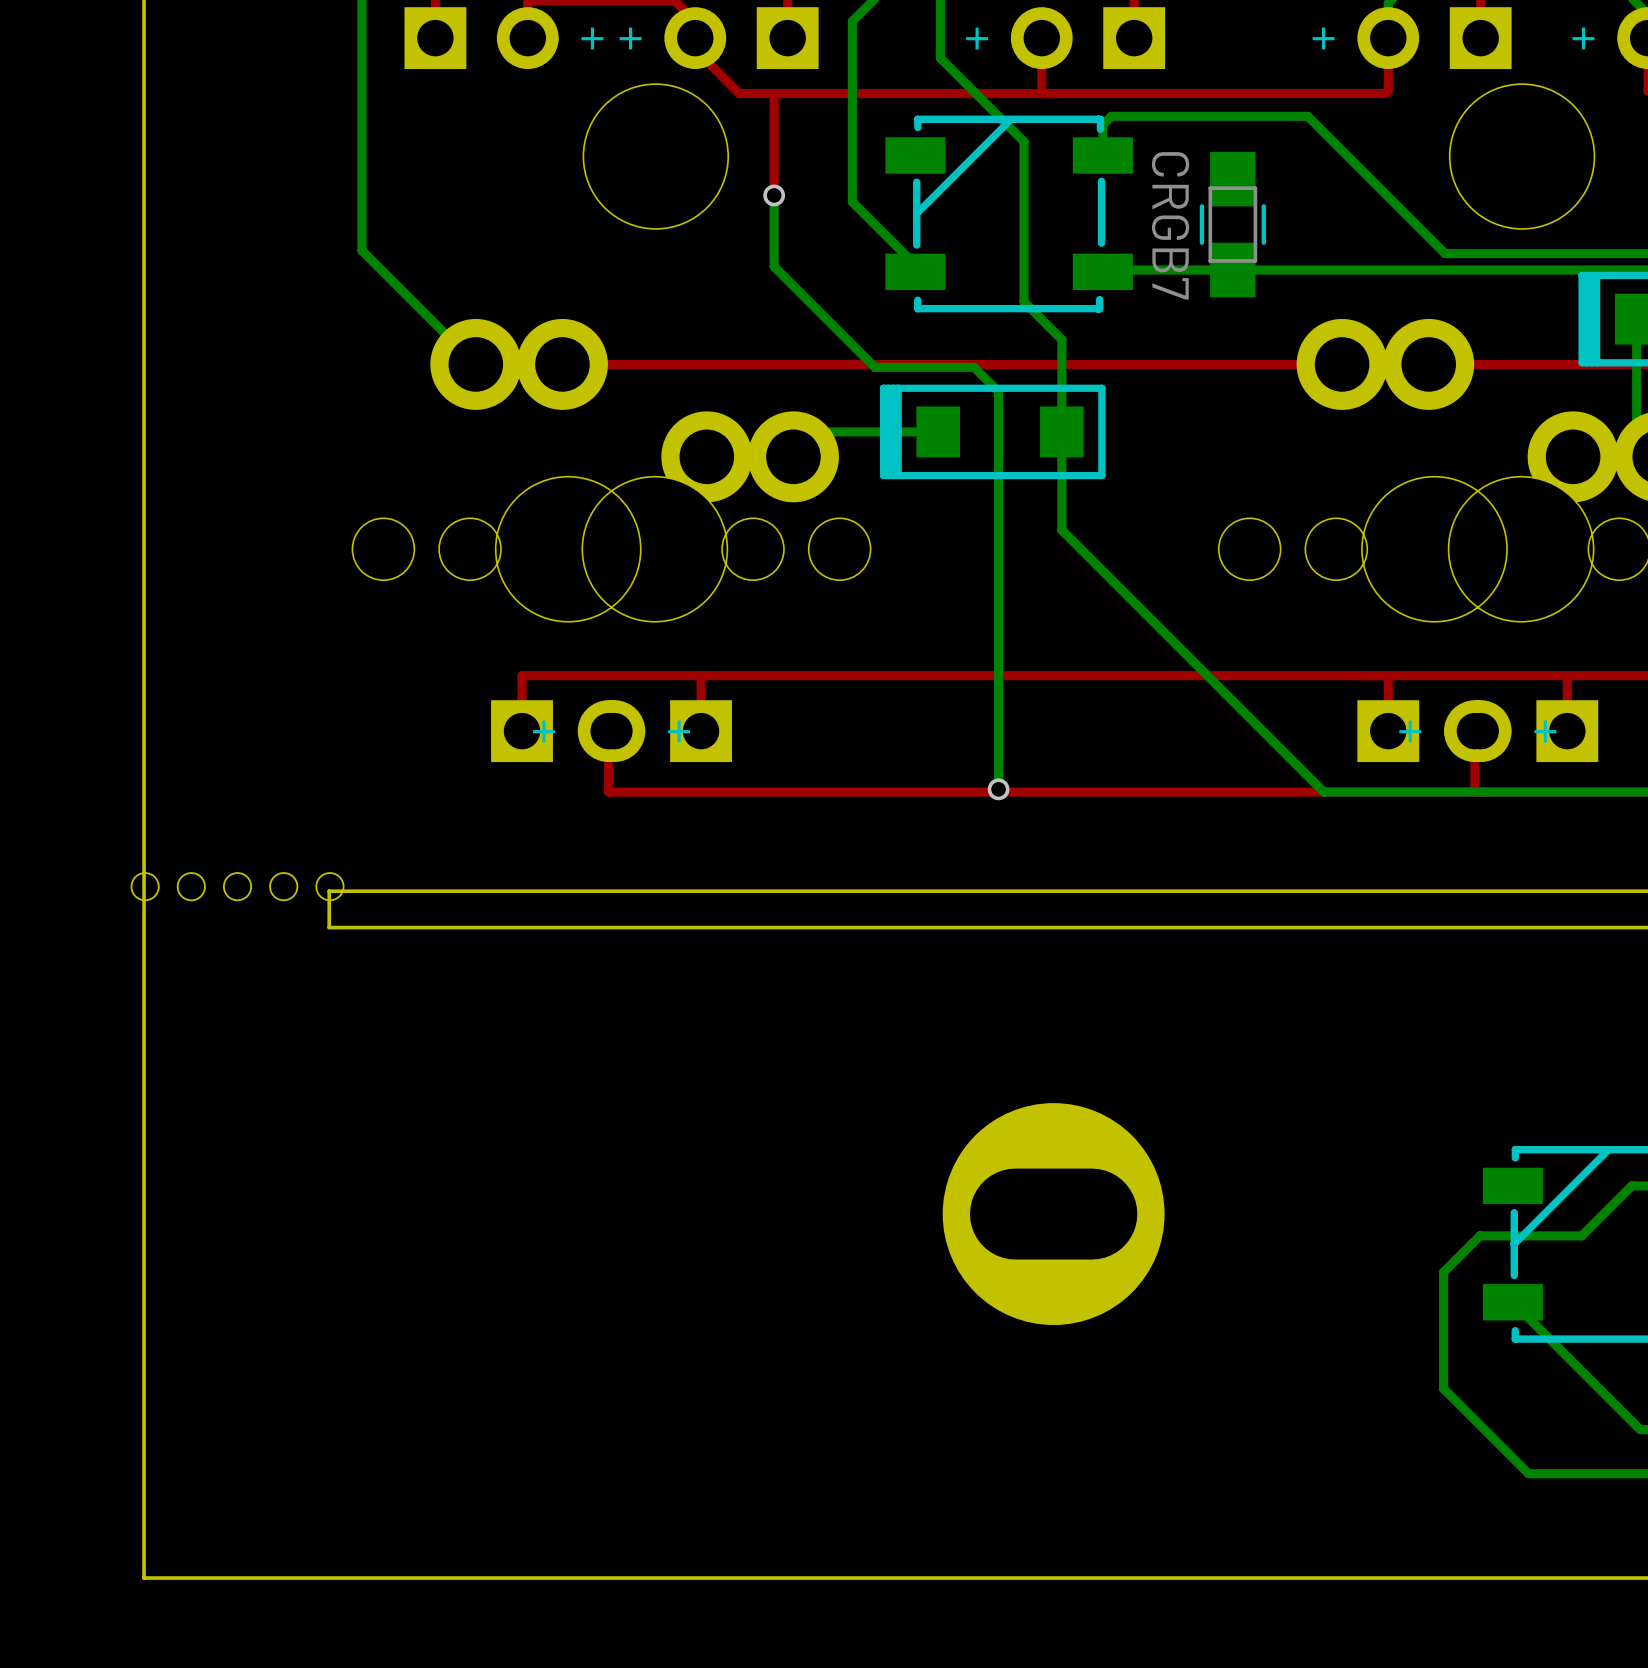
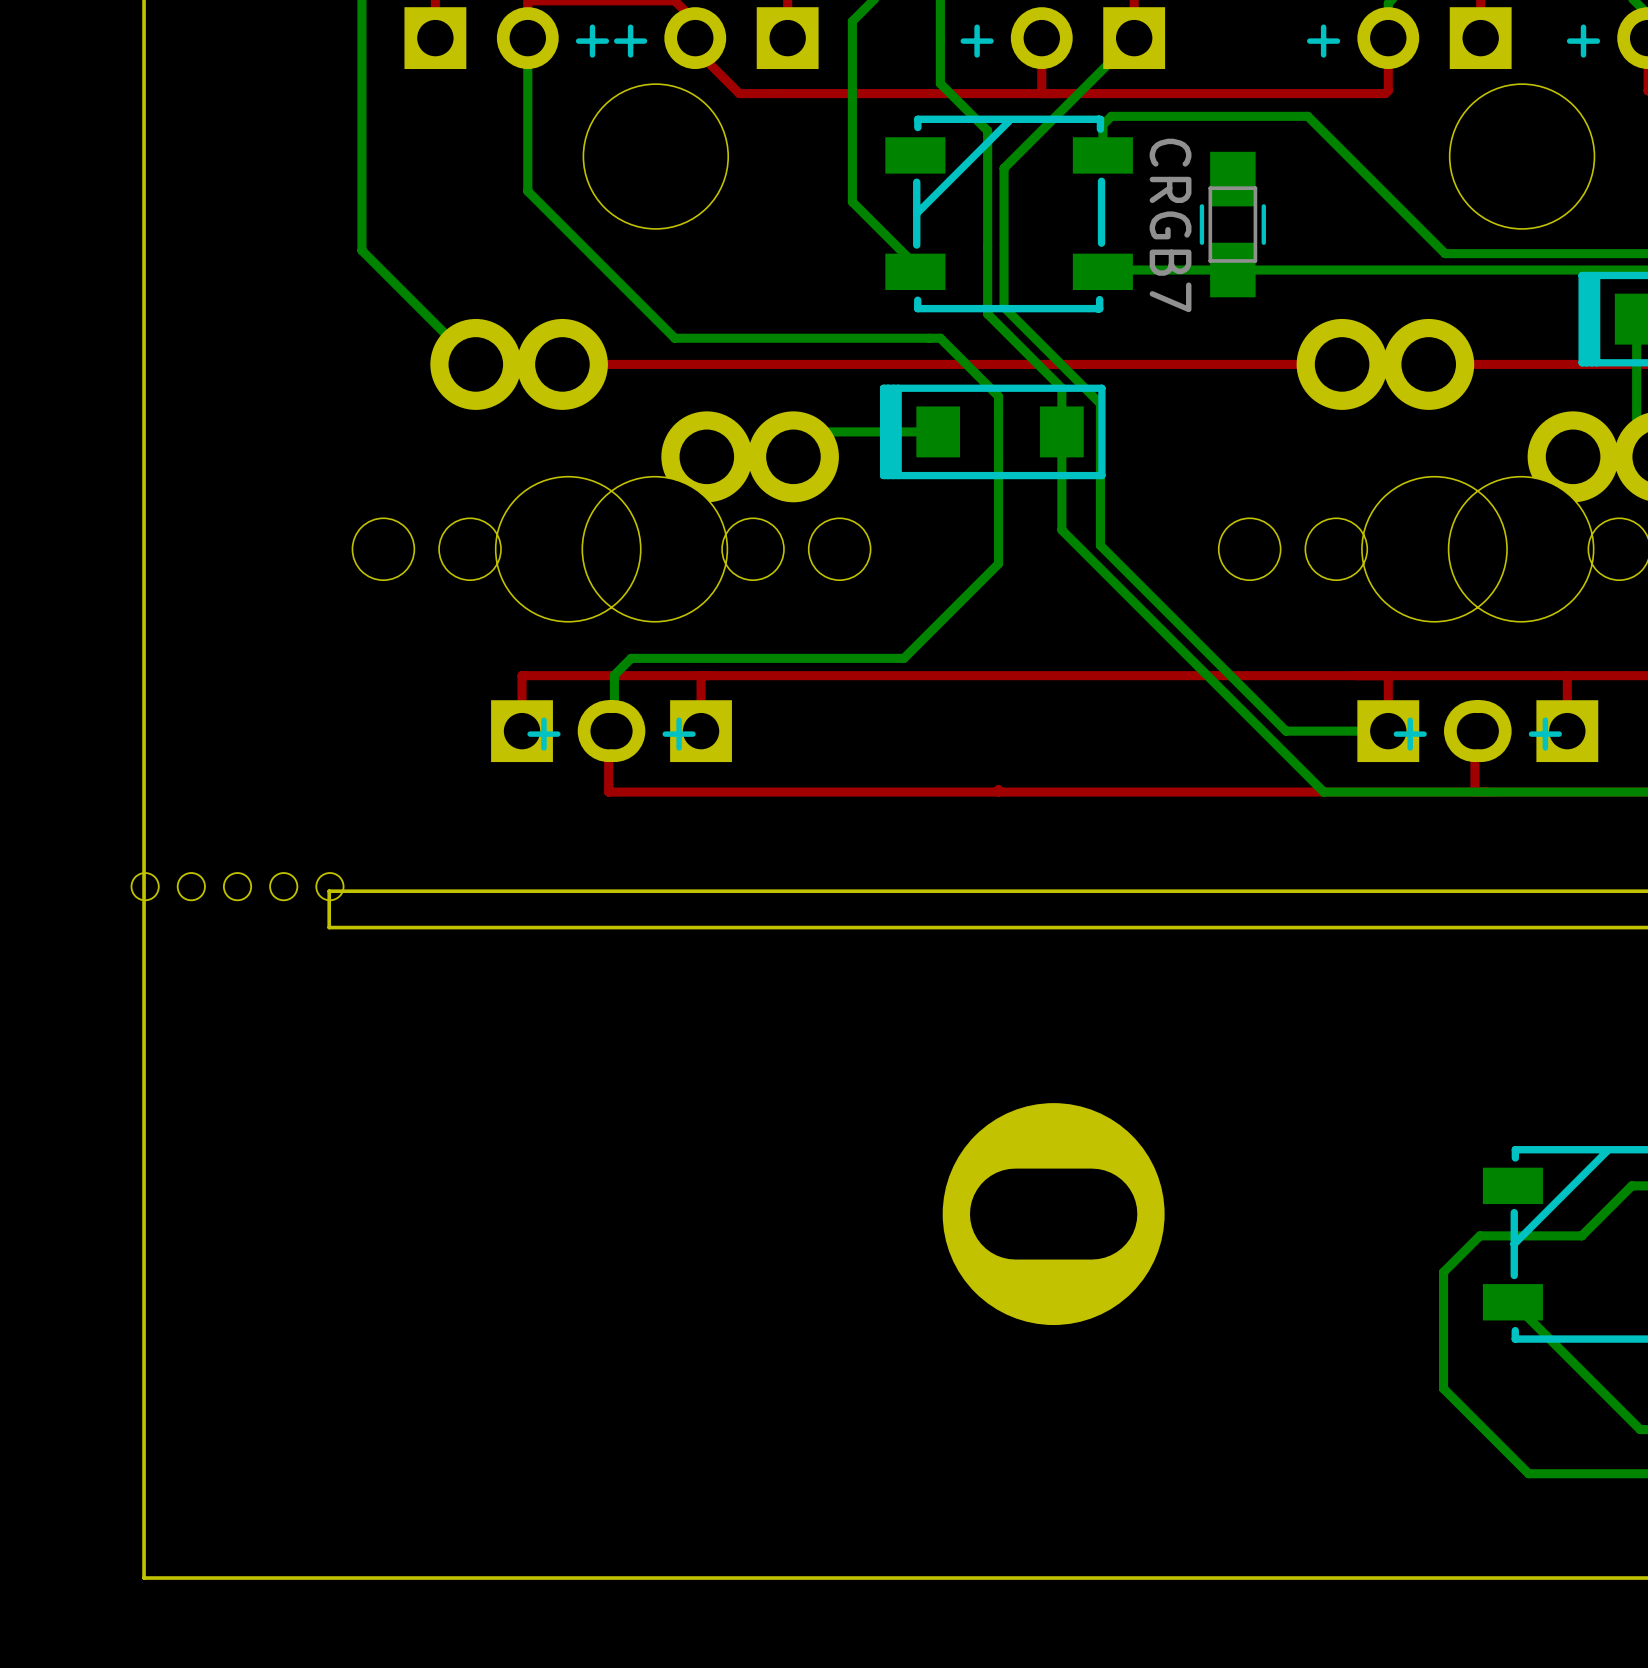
bottom track: none -> (1131, 38) (1134, 38) (1004, 168) (1004, 307) (1100, 403) (1100, 545) (1286, 731) (1388, 731)
bottom track: (940, 58) (1024, 141) (1024, 301) (1061, 339) (1061, 388) -> (940, 58) (940, 83) (987, 130) (987, 314) (1061, 388)
top track: (773, 93) (774, 195) -> none
bottom track: (774, 195) (774, 266) (874, 367) (974, 367) (998, 391) (998, 396) -> (527, 38) (527, 191) (674, 338) (940, 338) (998, 396)
via: (774, 195) -> none
bottom track: (998, 563) (998, 789) -> (998, 563) (903, 658) (631, 658) (614, 675) (614, 731)
via: (998, 789) -> none

